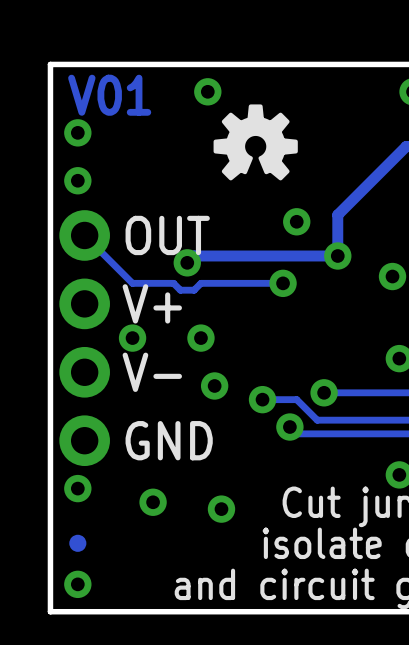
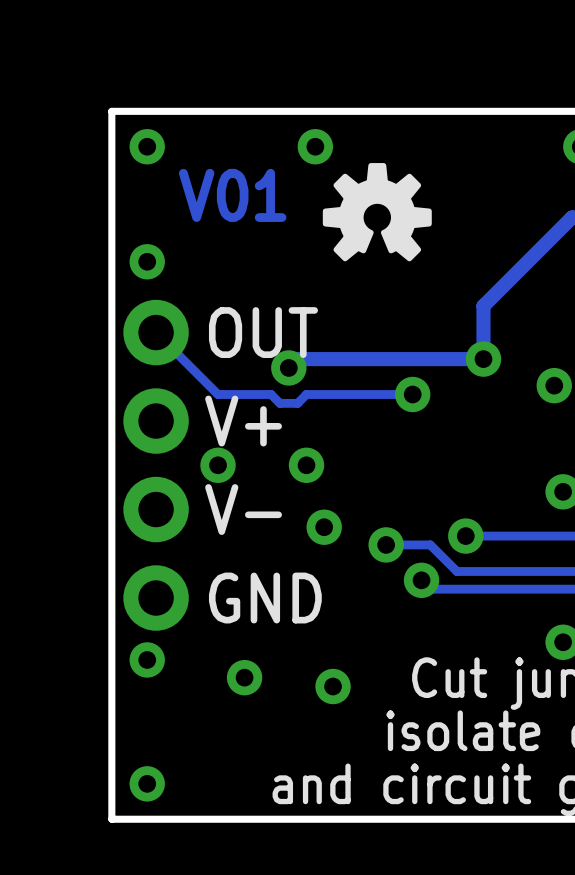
text position: V01 (109, 95) -> V01 (232, 195)
via position: (77, 132) -> (147, 146)
via: (296, 221) -> none
part: (77, 543) -> none

